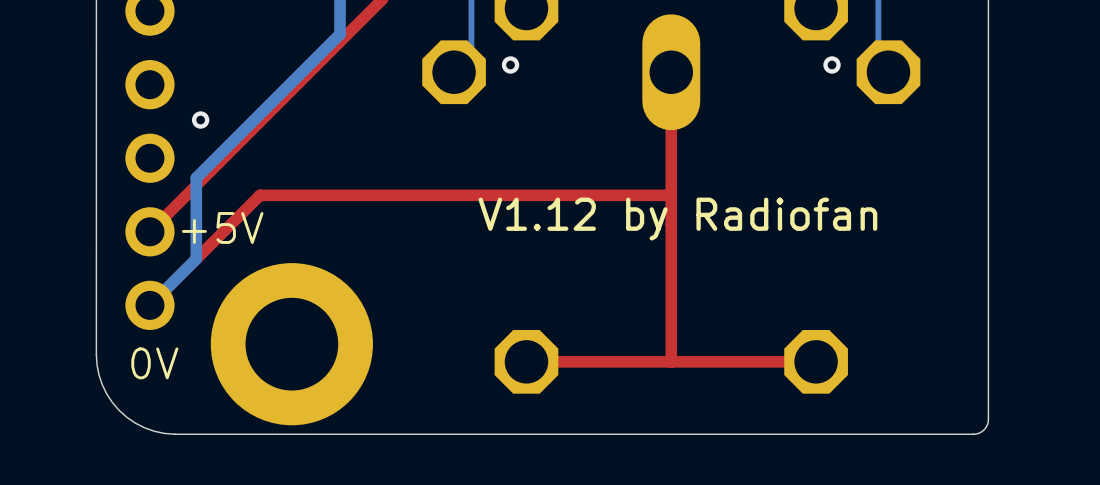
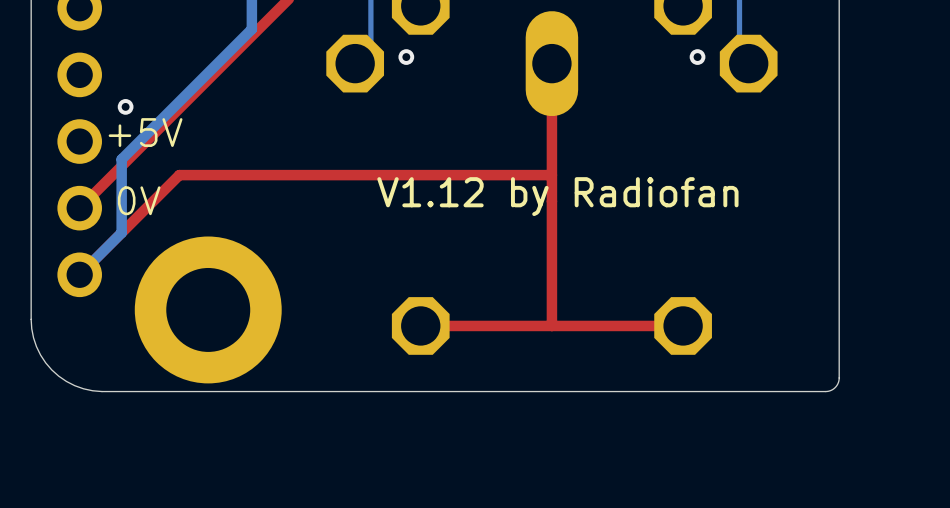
text position: +5V (222, 227) -> +5V (145, 132)
text position: 0V (154, 363) -> 0V (139, 200)

